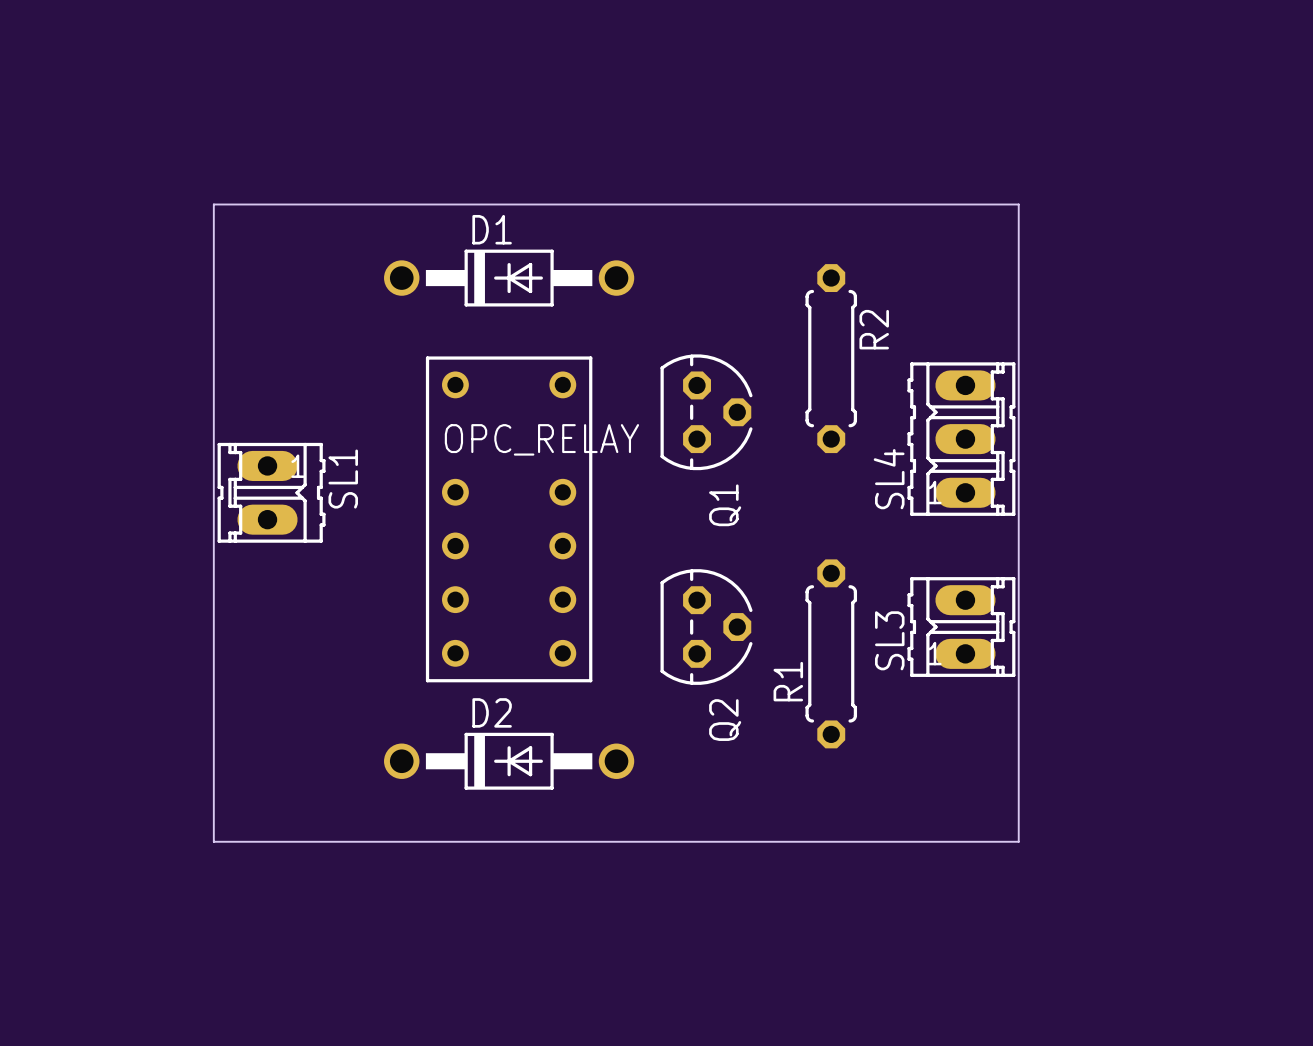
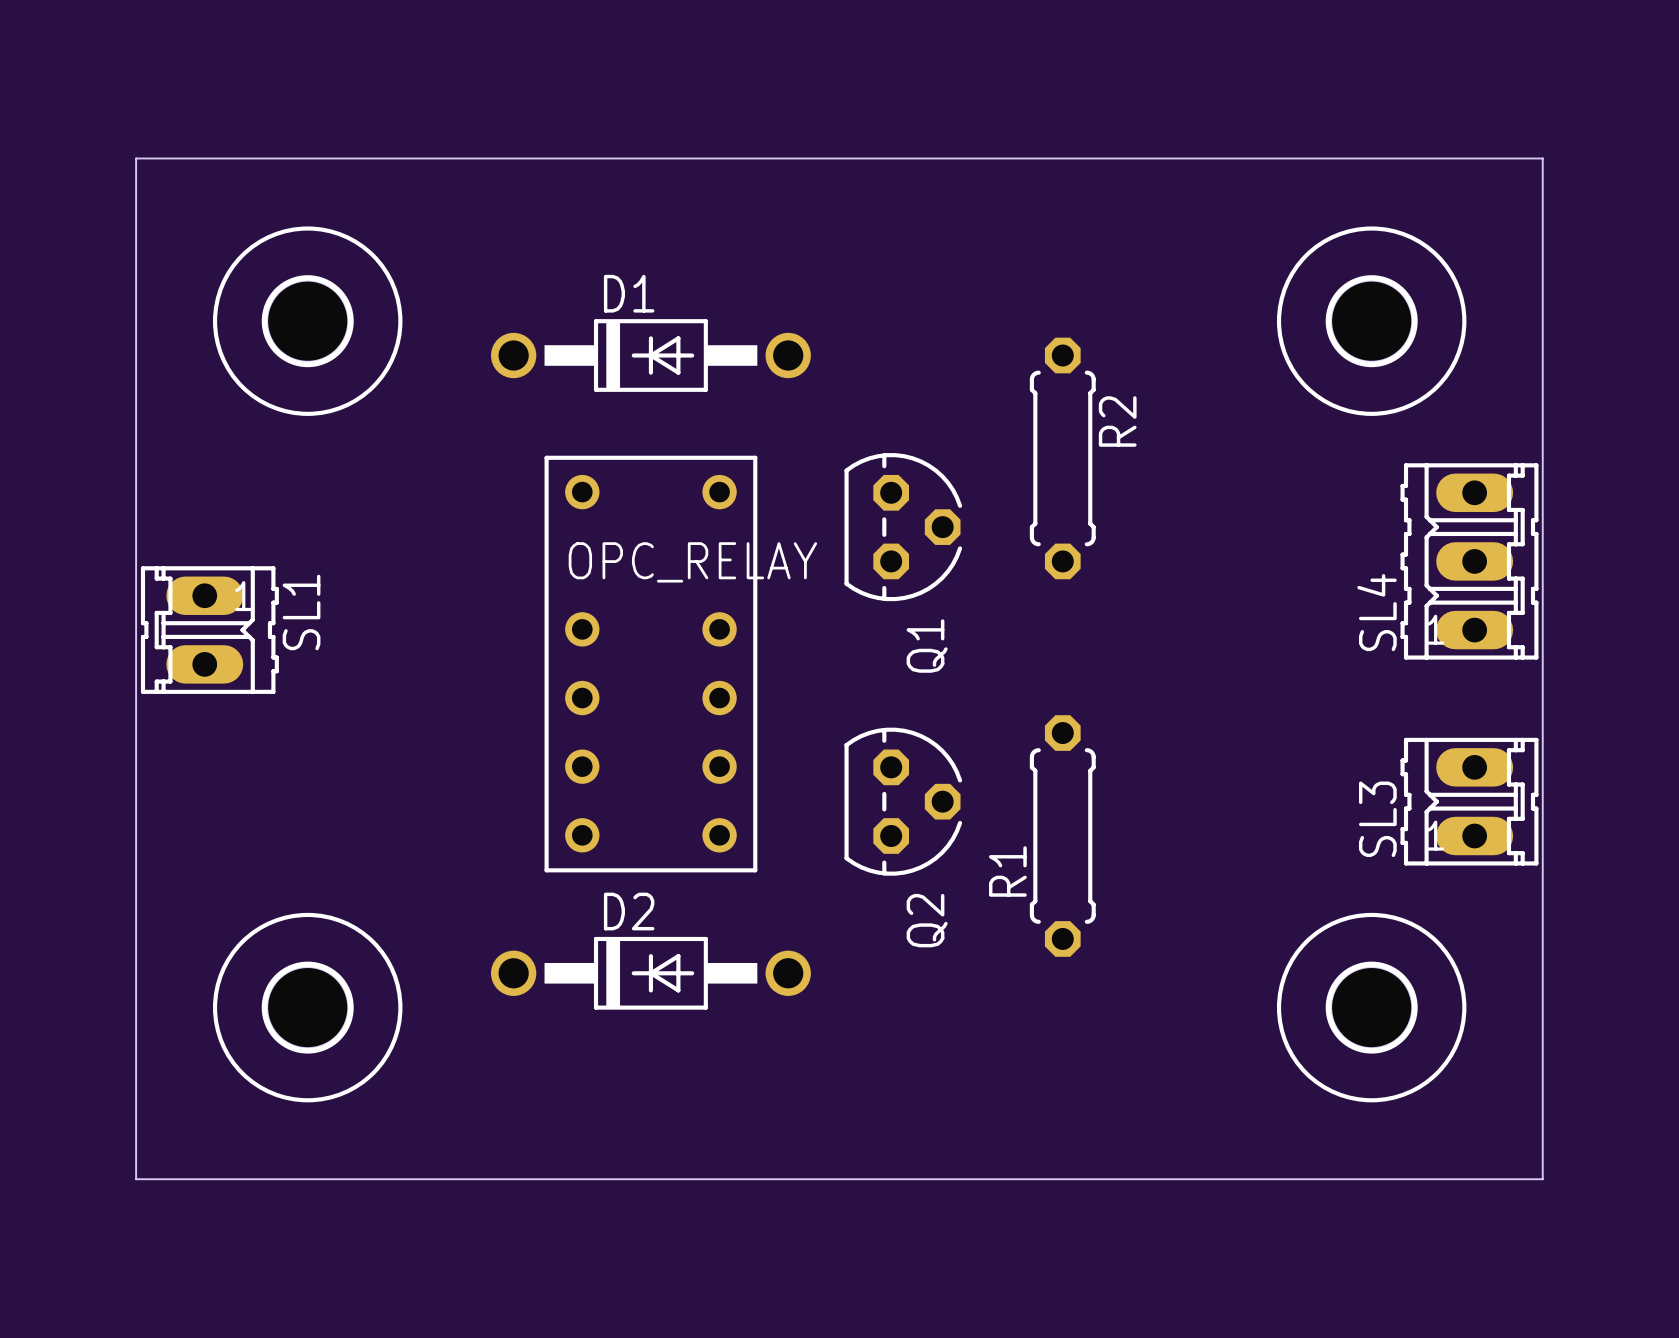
board edge: (213, 204) (1018, 204) (1018, 841) (213, 841) (213, 204) -> (136, 158) (136, 1179) (1542, 1179) (1542, 158) (136, 158)
part: none -> (307, 321)
part: none -> (1371, 321)
SL4 position: (961, 439) -> (1469, 561)
SL1 position: (271, 492) -> (209, 630)
SL3 position: (961, 627) -> (1469, 801)
part: none -> (307, 1007)
part: none -> (1371, 1007)

